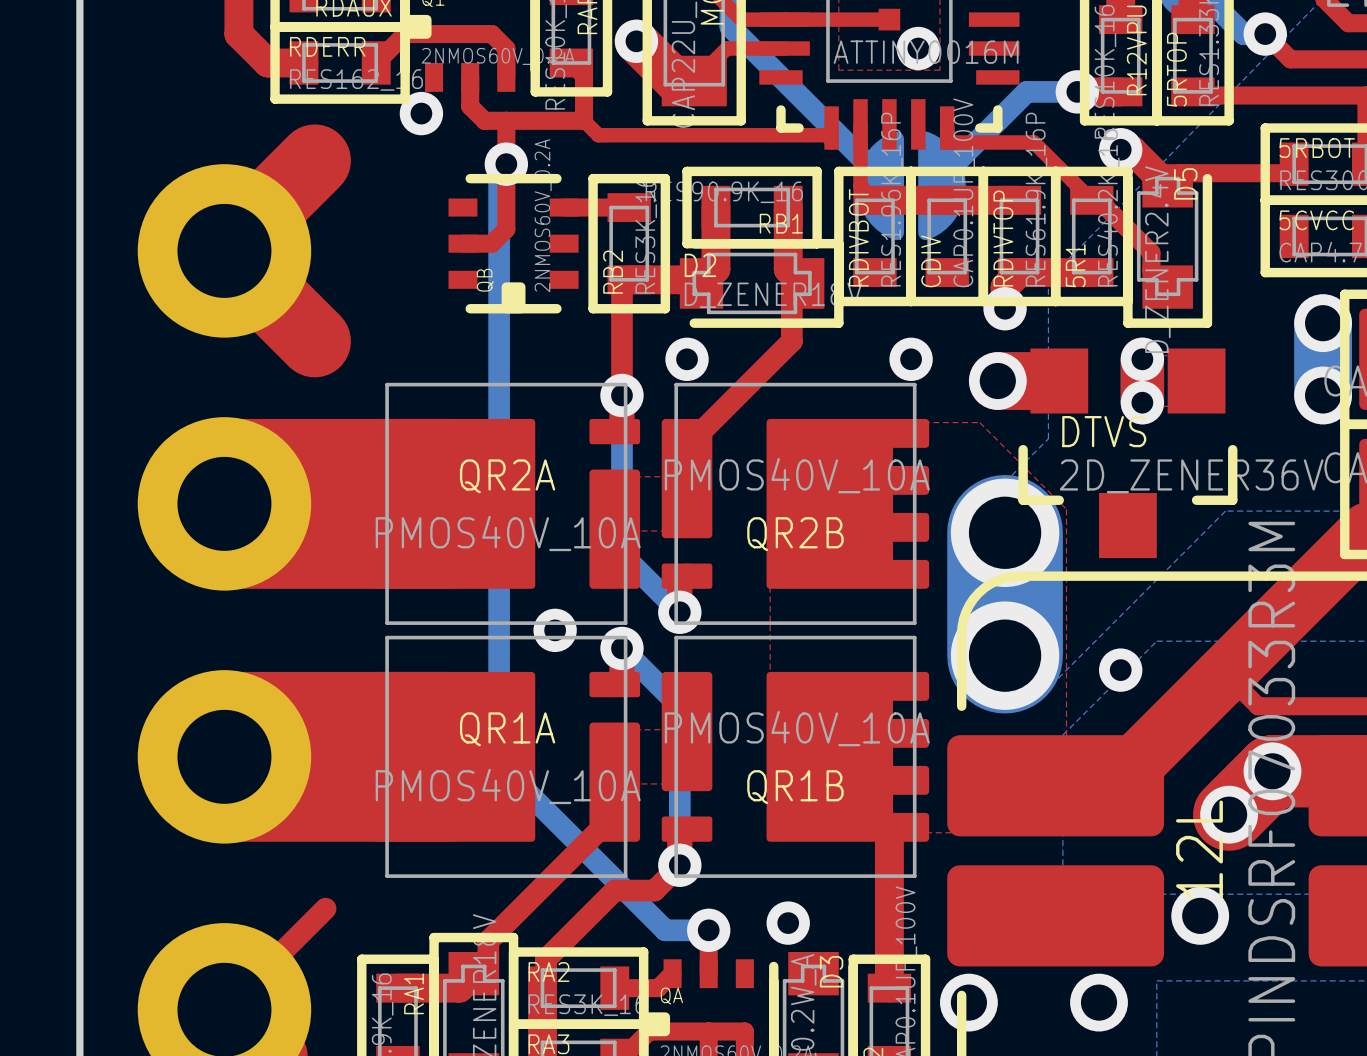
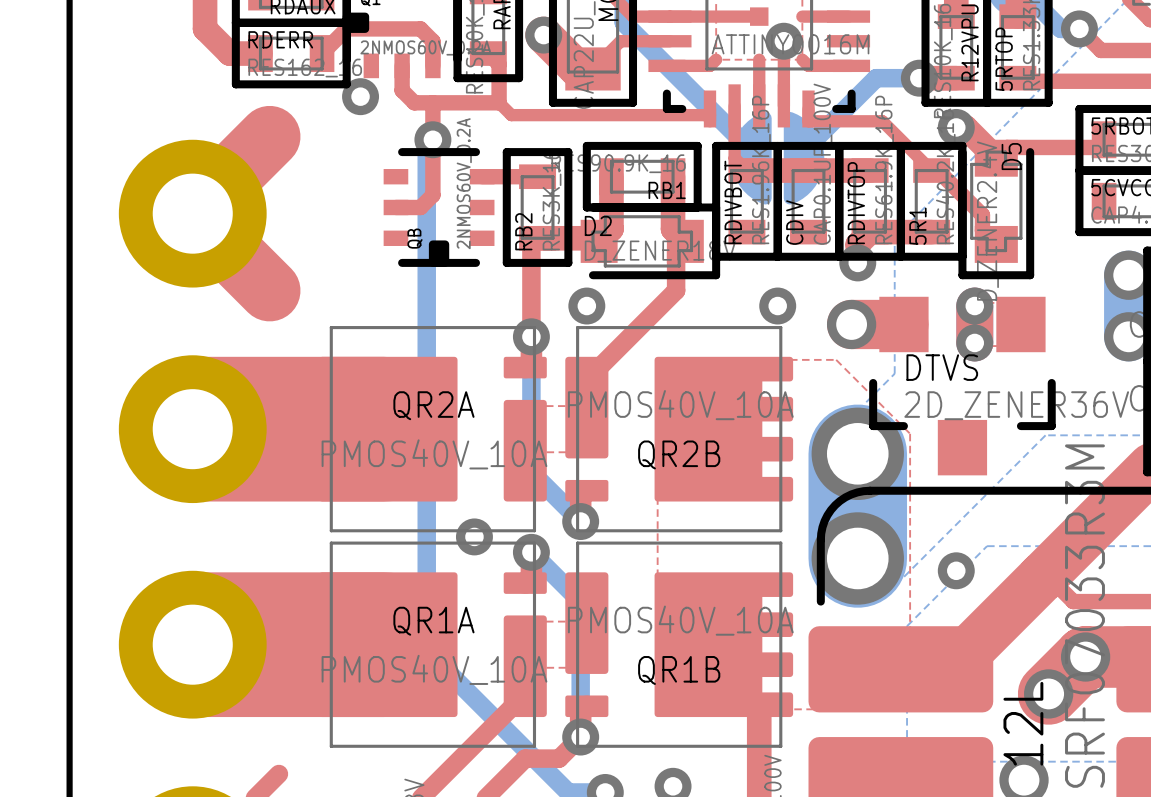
top track: none -> (802, 16) (848, 16)
top track: none -> (716, 59) (709, 65) (666, 65)
top track: none -> (759, 59) (759, 105)
top track: none -> (783, 59) (783, 105)
top track: none -> (802, 59) (808, 65) (851, 65)

